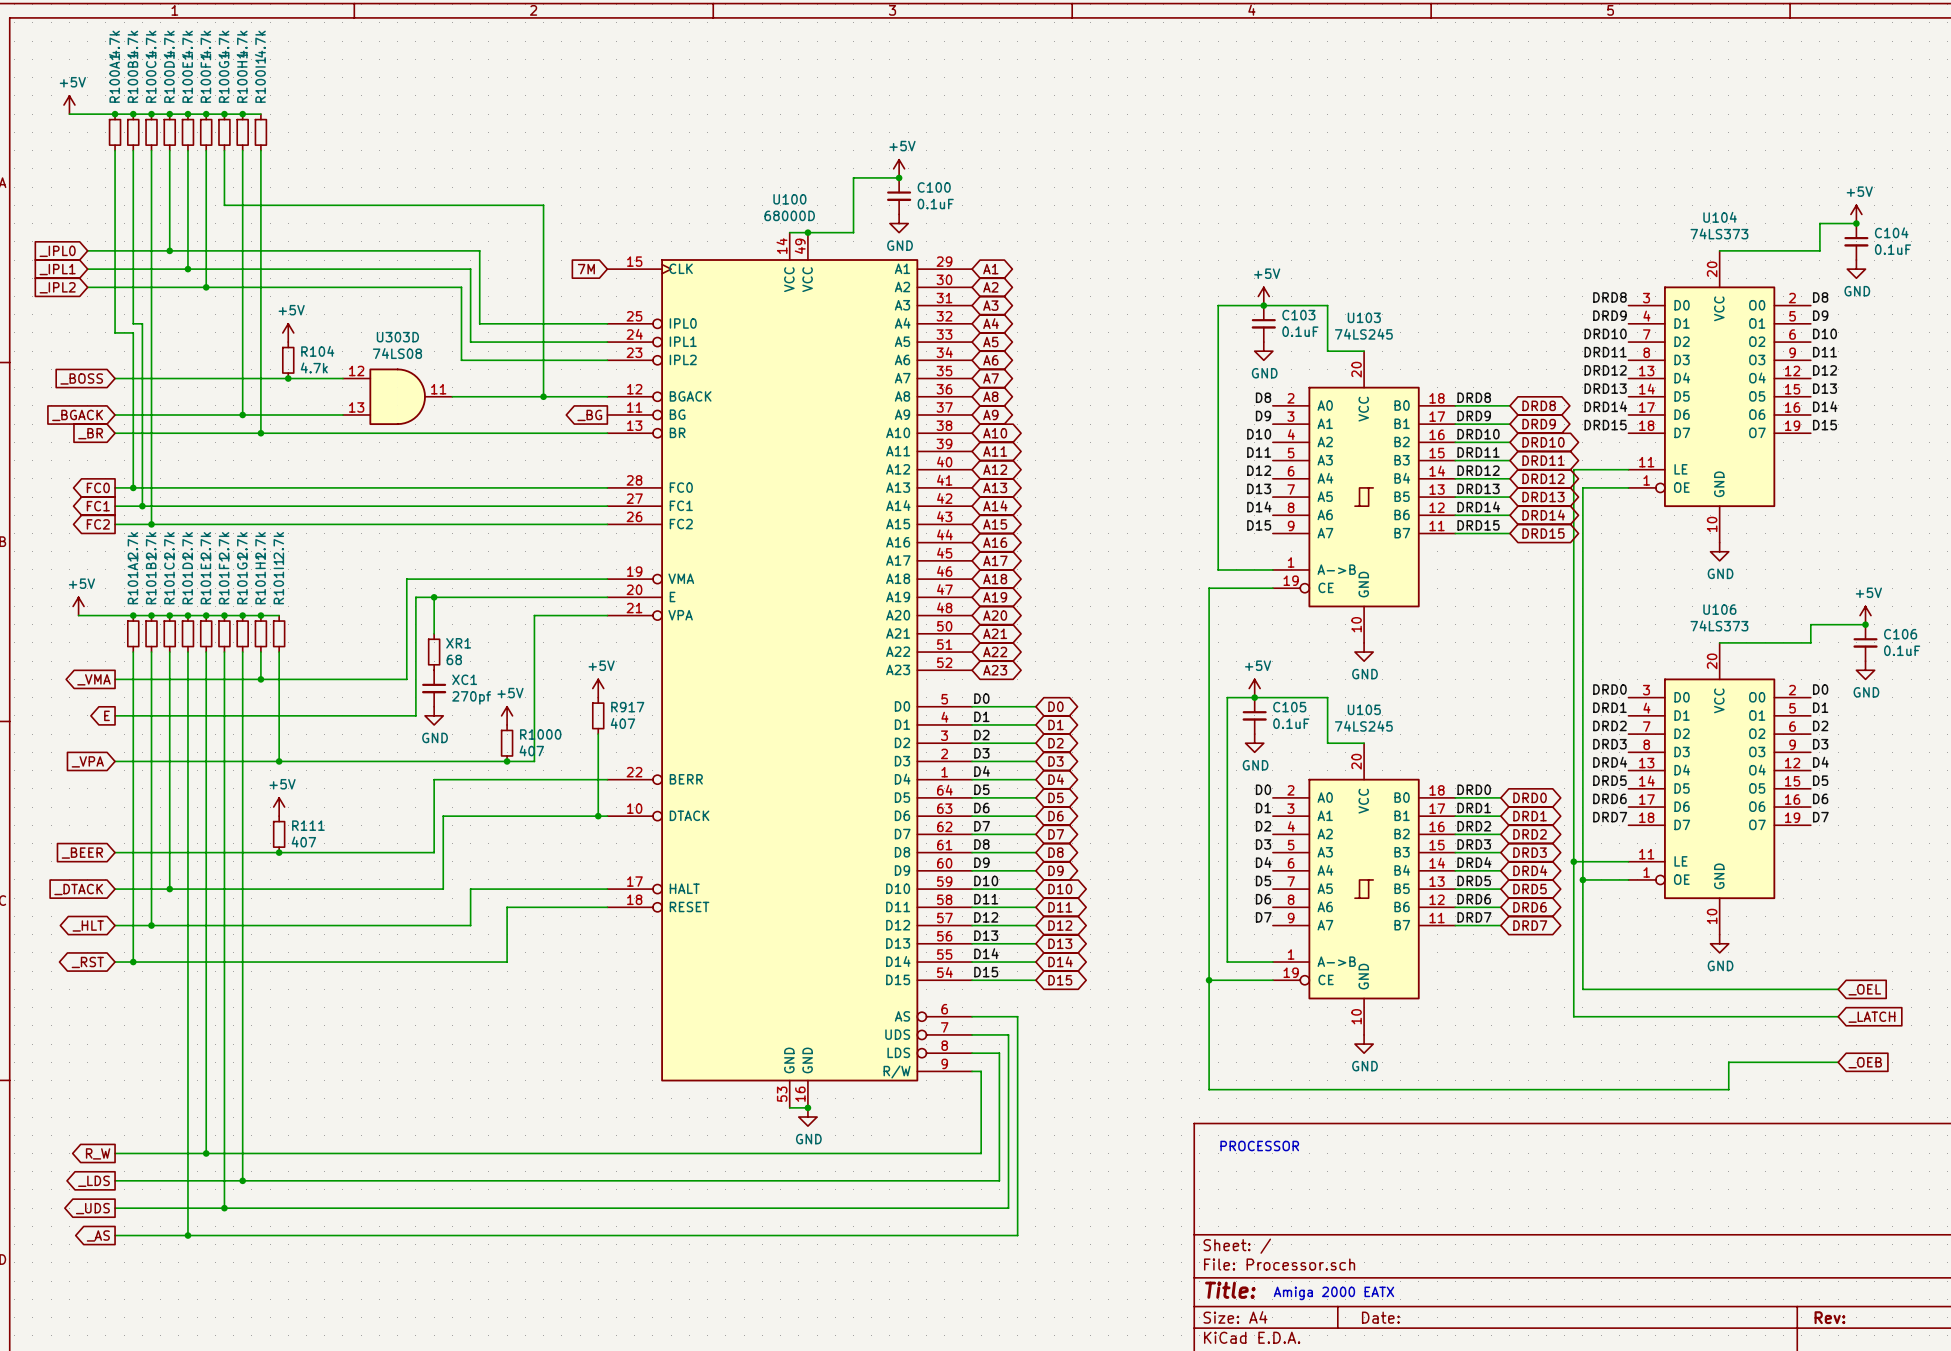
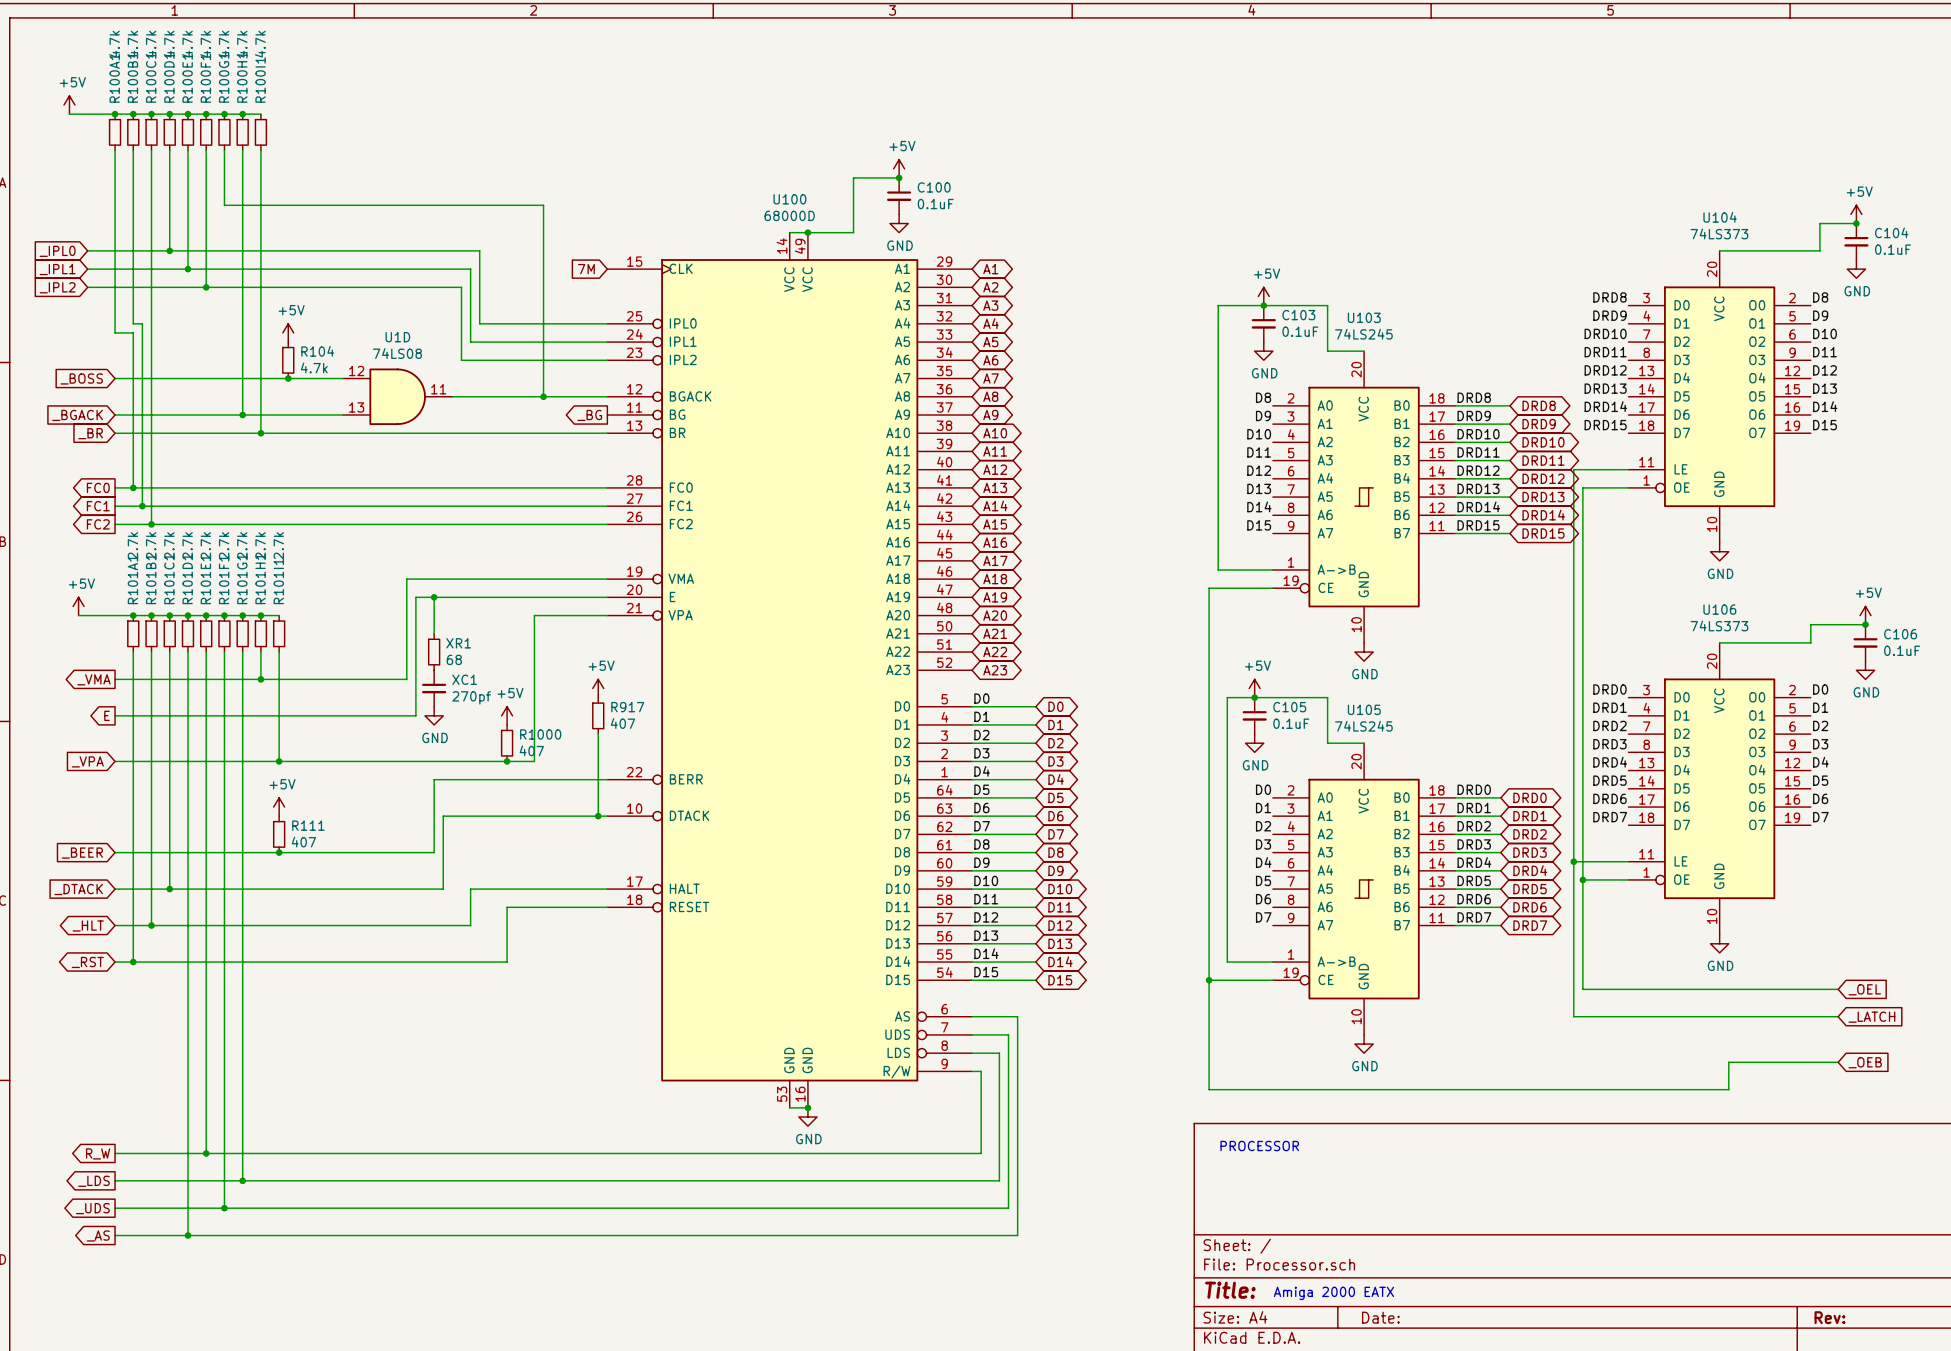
U303D name: U303D (397, 337) -> U1D (397, 337)

